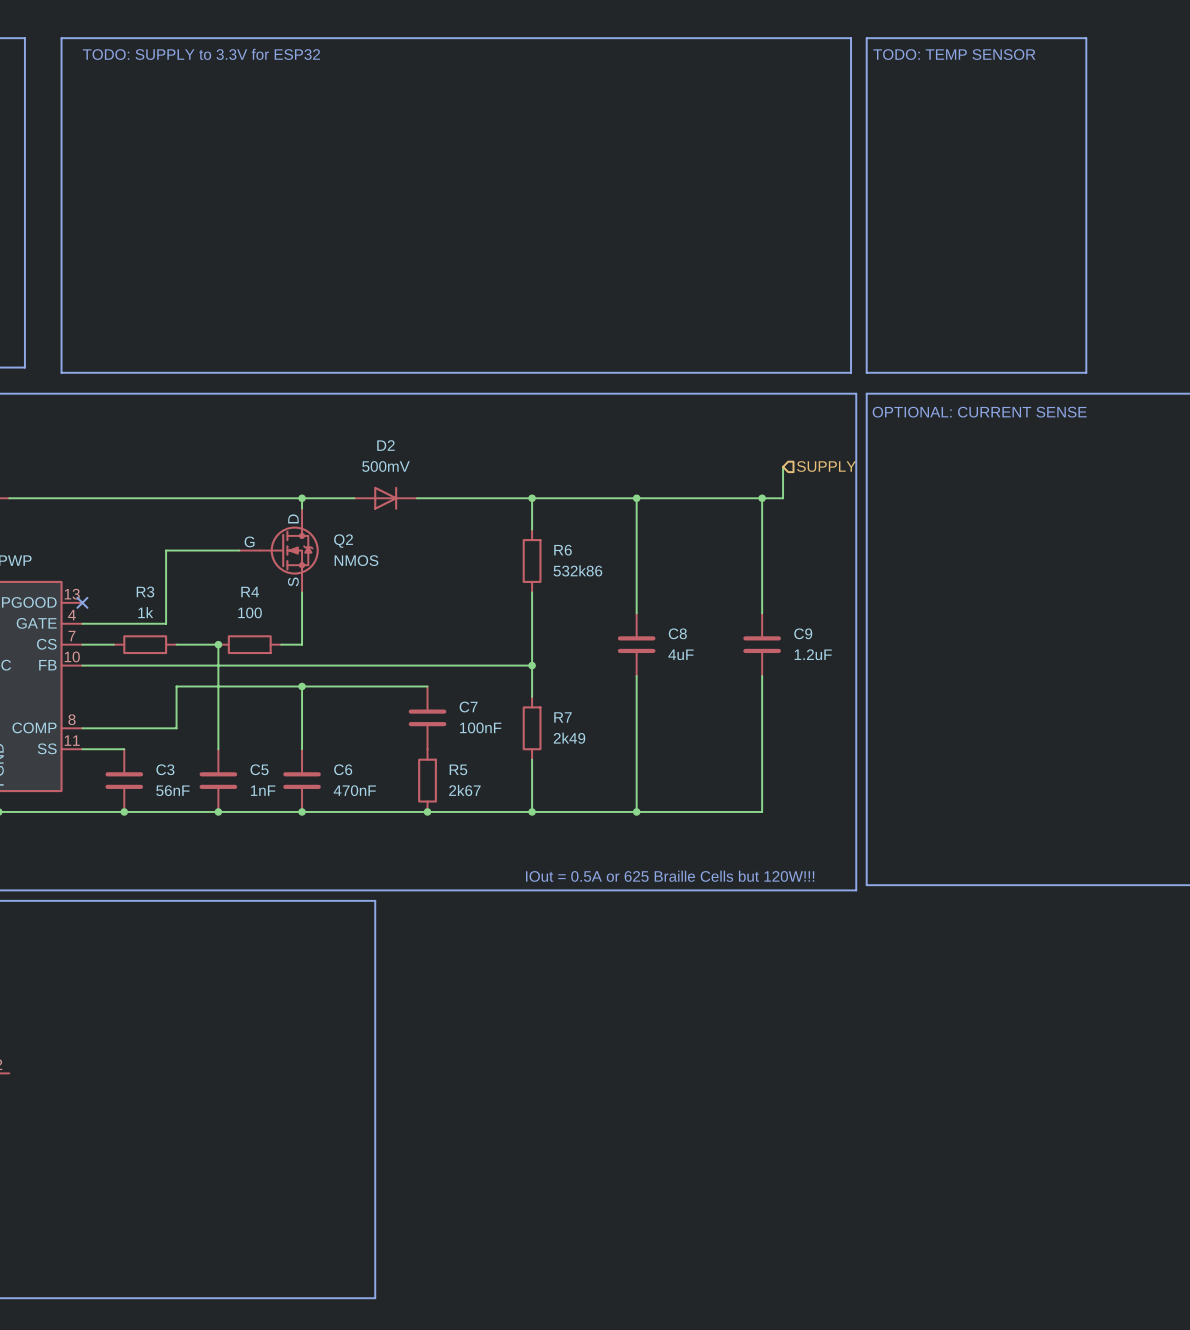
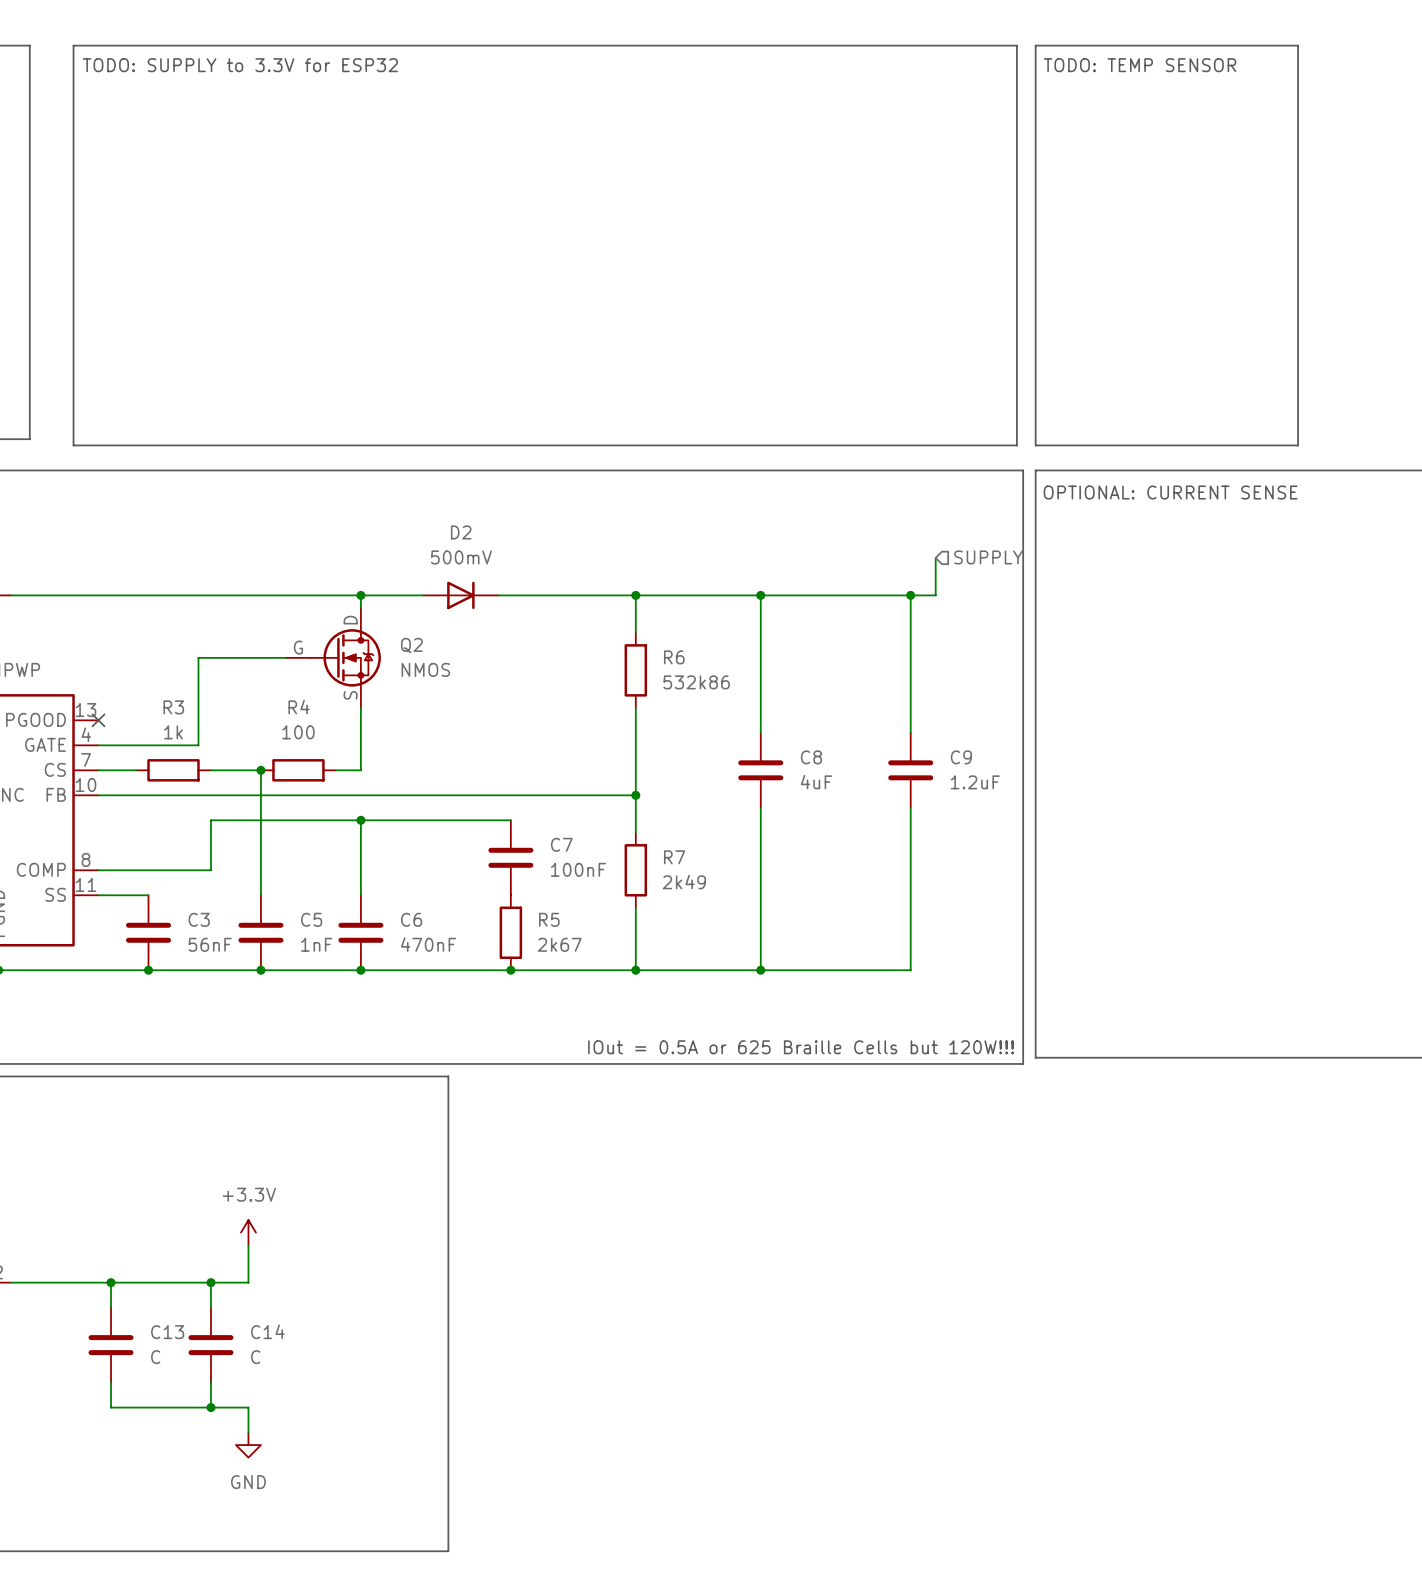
power symbol: none -> +3.3V (248, 1232)
wire: none -> (248, 1245) (248, 1282) (11, 1282)
wire: none -> (111, 1282) (111, 1307)
junction: none -> (111, 1282)
wire: none -> (210, 1282) (210, 1307)
junction: none -> (210, 1282)
C13: none -> C (111, 1345)
C14: none -> C (210, 1345)
wire: none -> (111, 1382) (111, 1407) (248, 1407) (248, 1432)
wire: none -> (210, 1382) (210, 1407)
junction: none -> (210, 1407)
power symbol: none -> GND (248, 1445)

